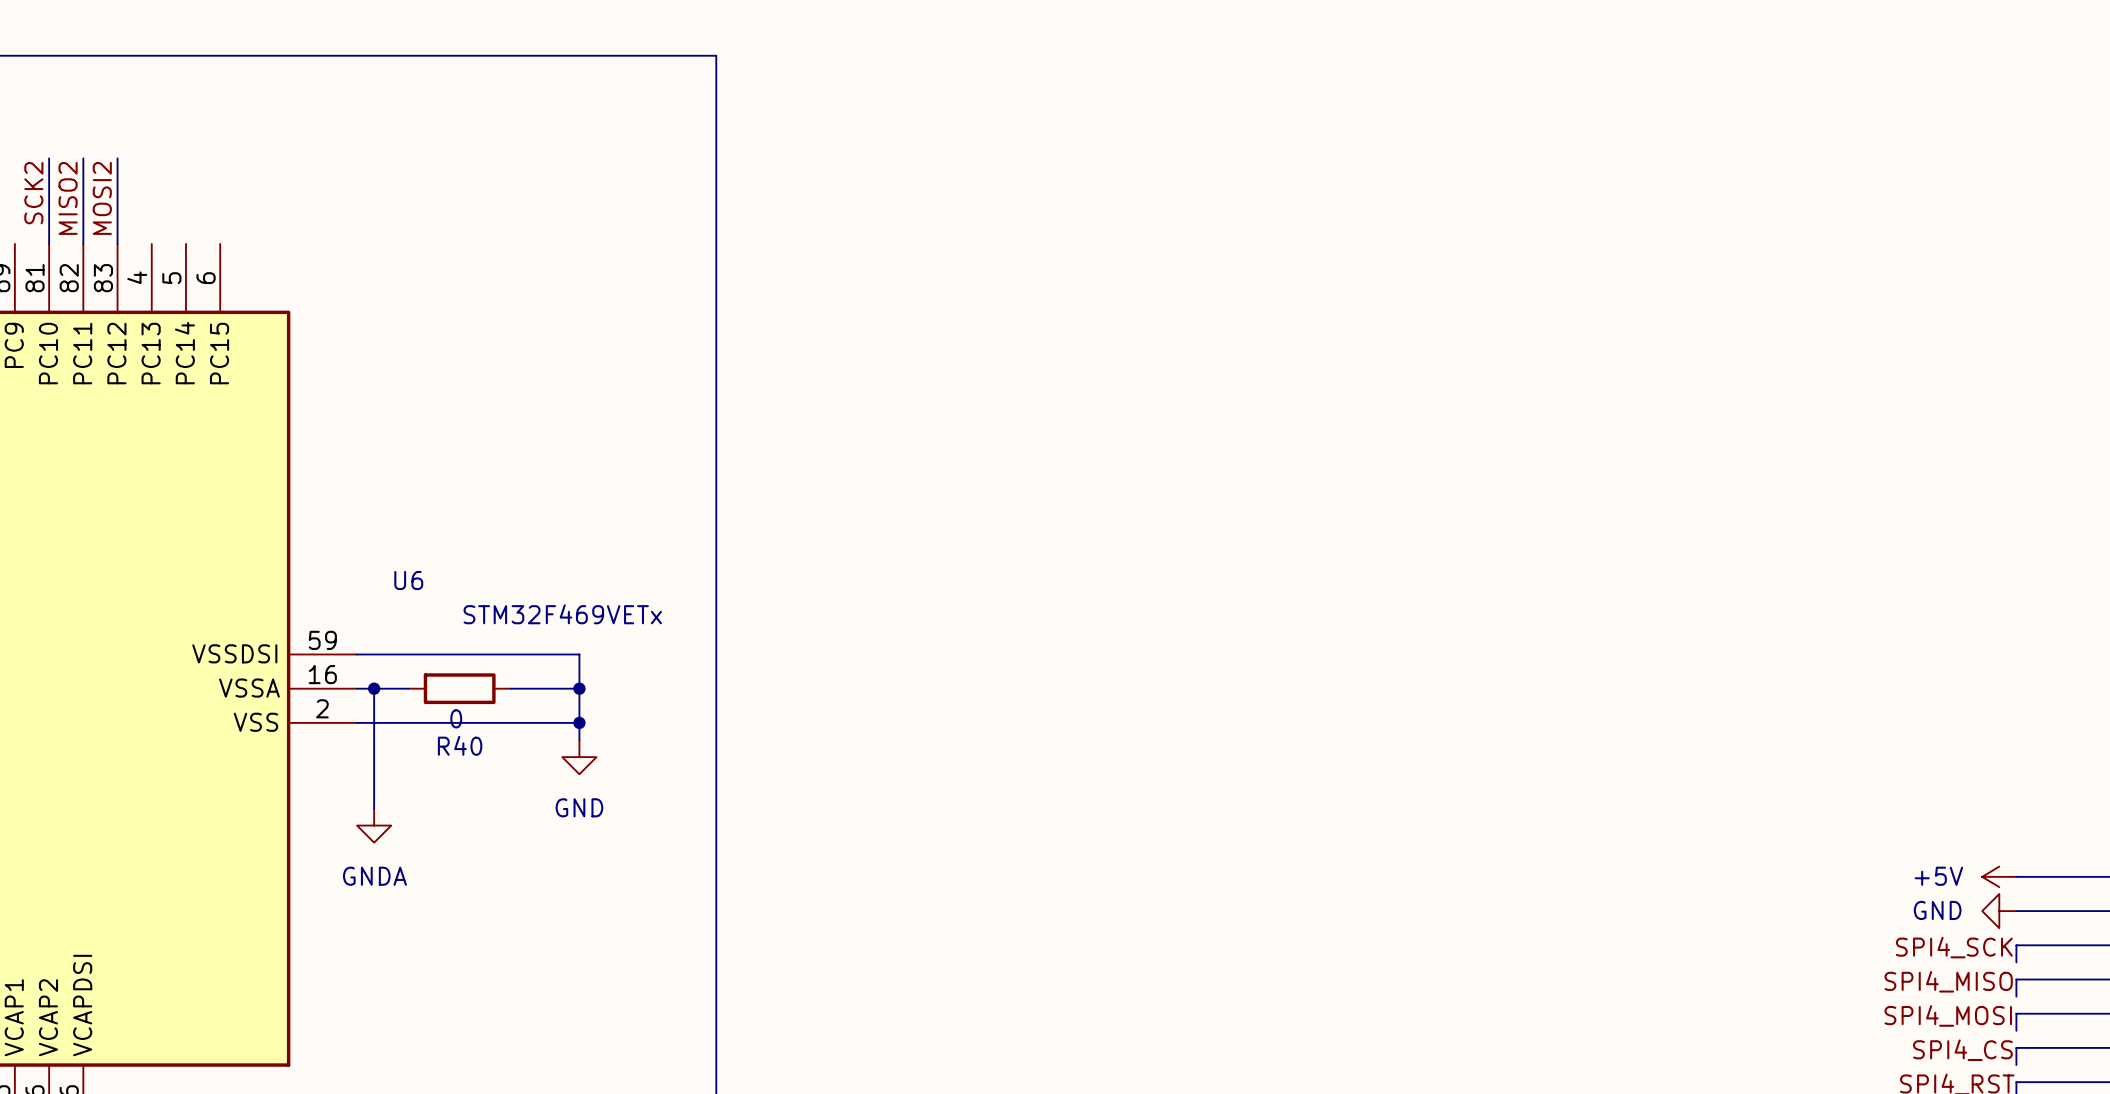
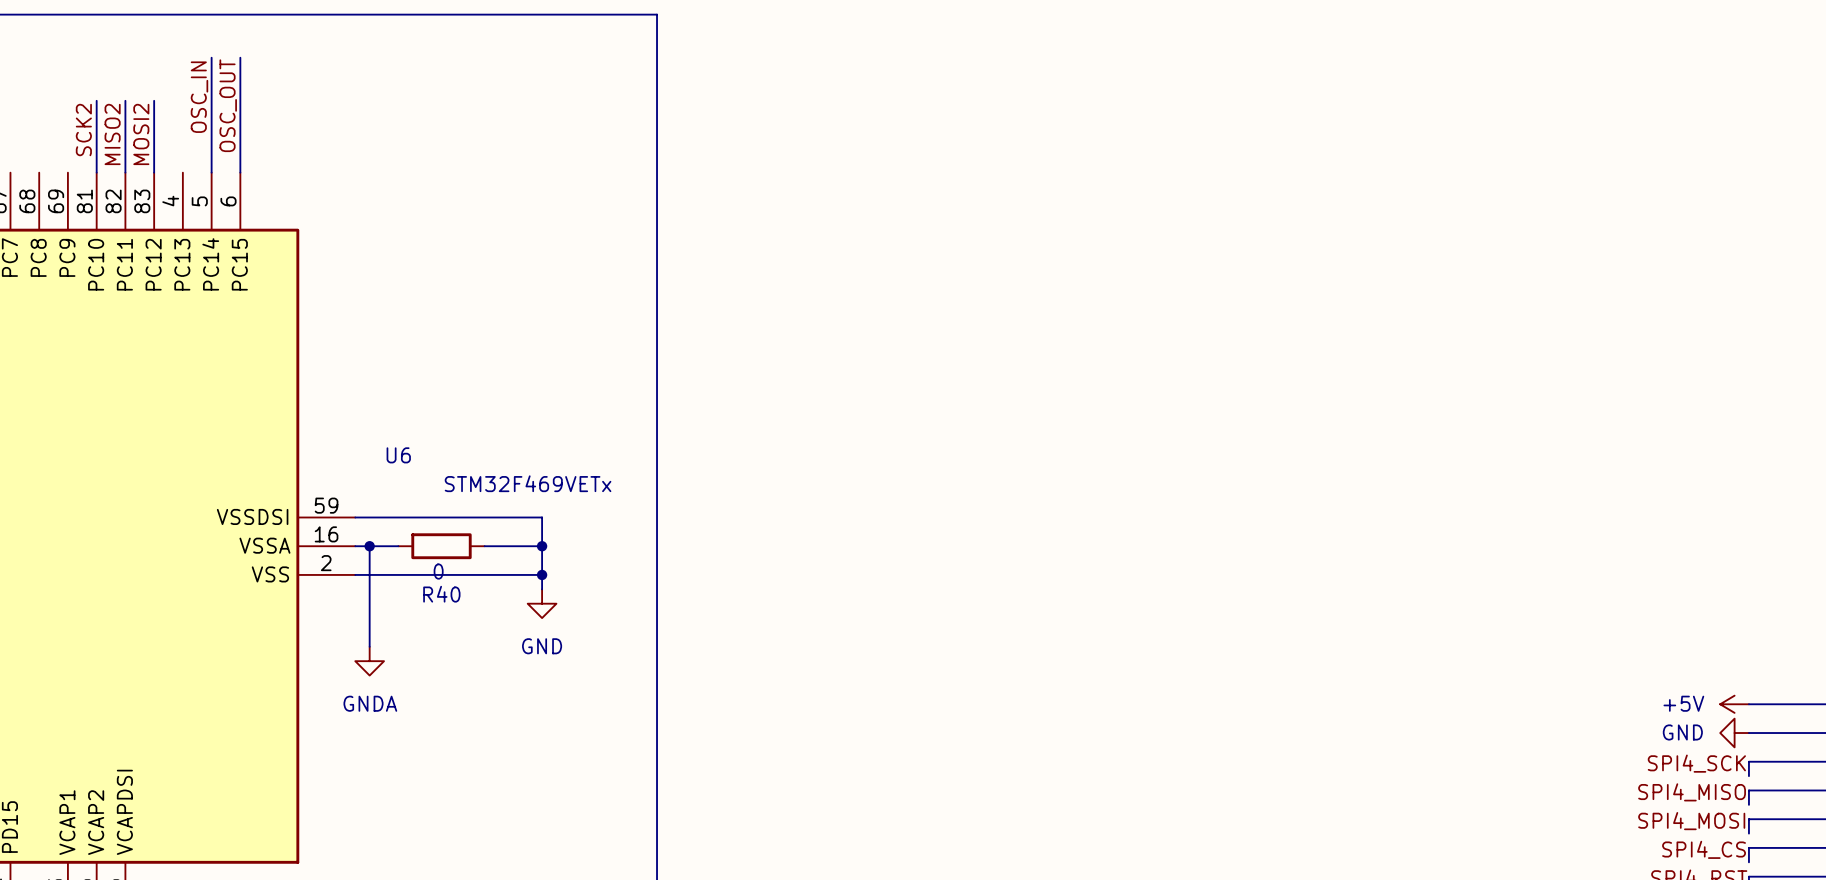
wire: none -> (211, 57) (211, 172)
wire: none -> (240, 57) (240, 172)
label: none -> OSC_IN (199, 97)
label: none -> OSC_OUT (228, 105)

